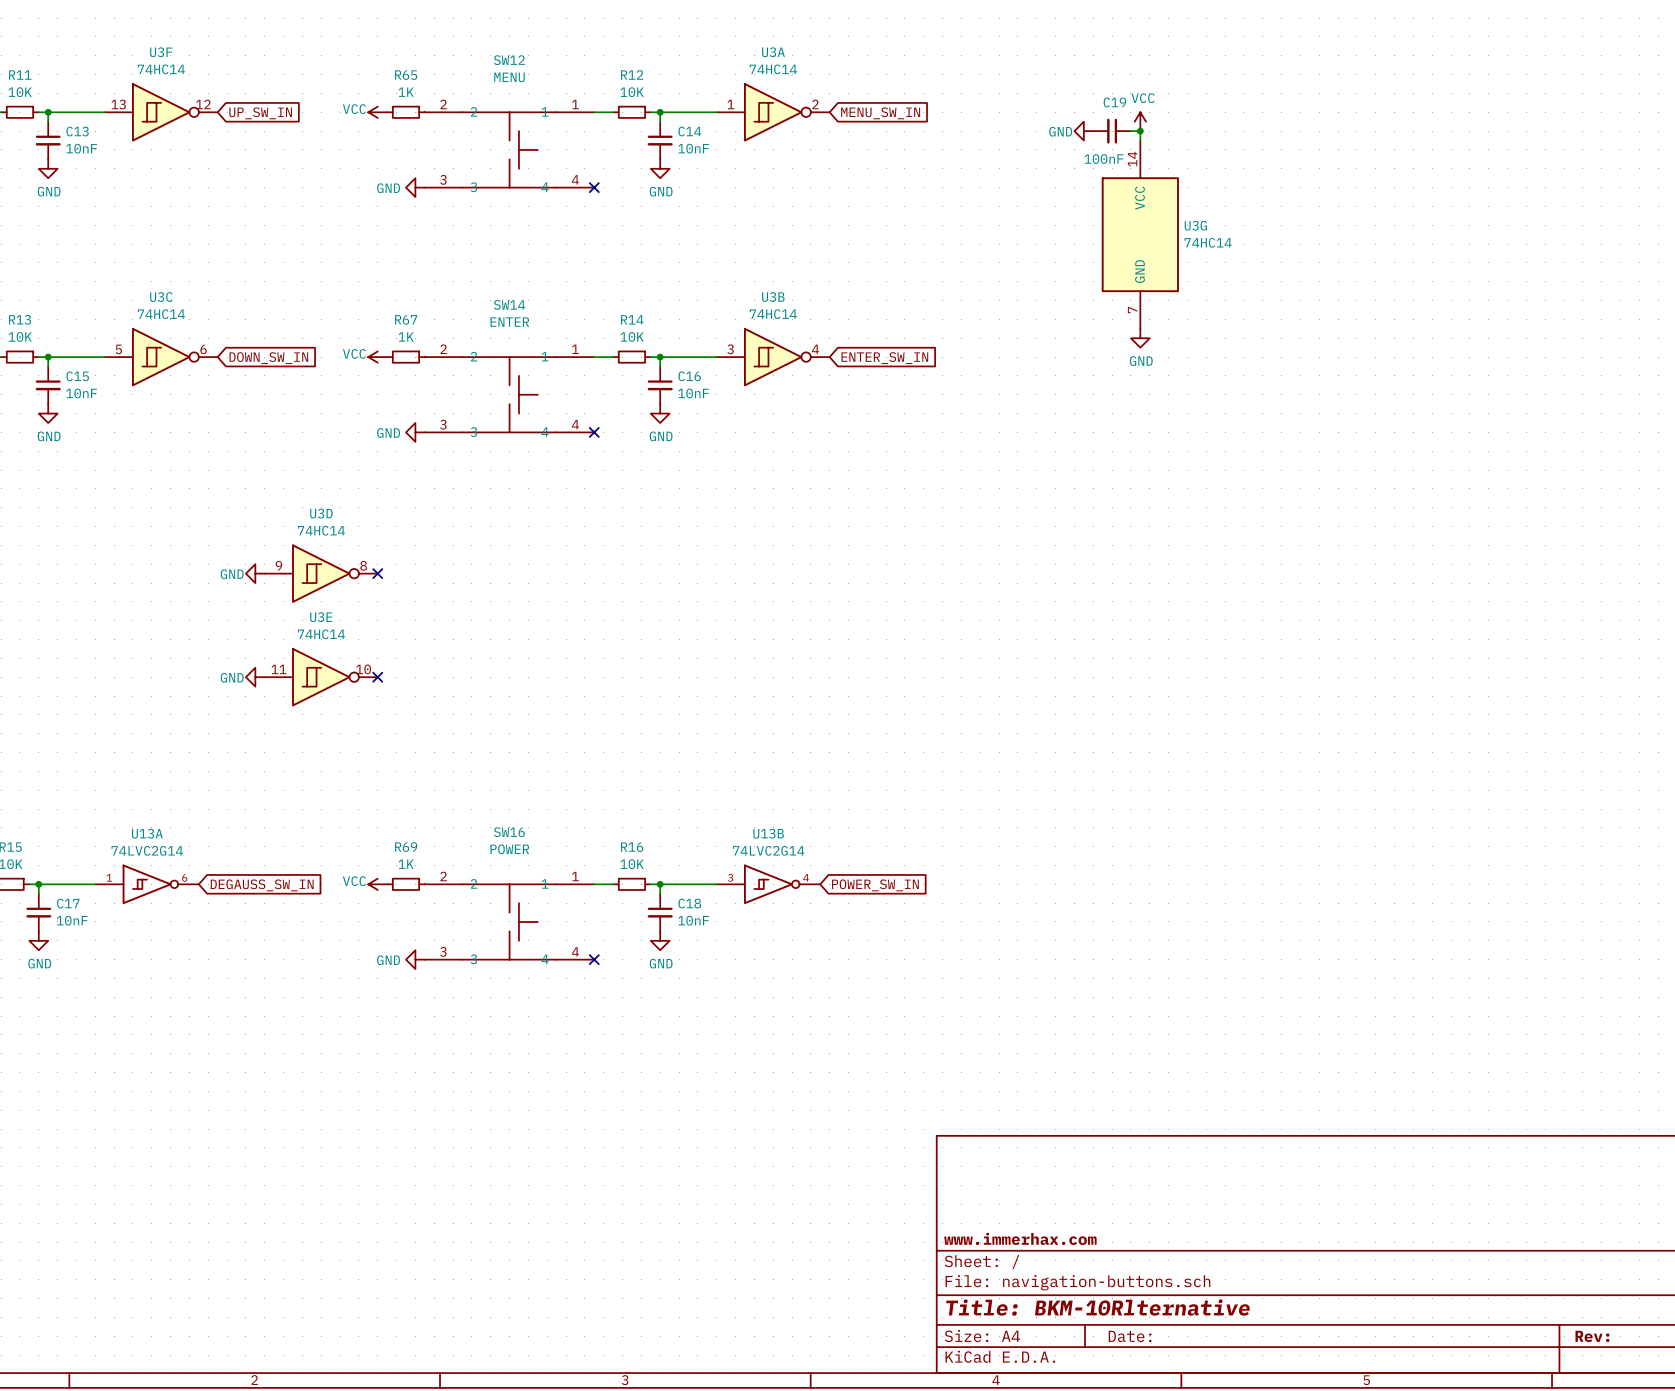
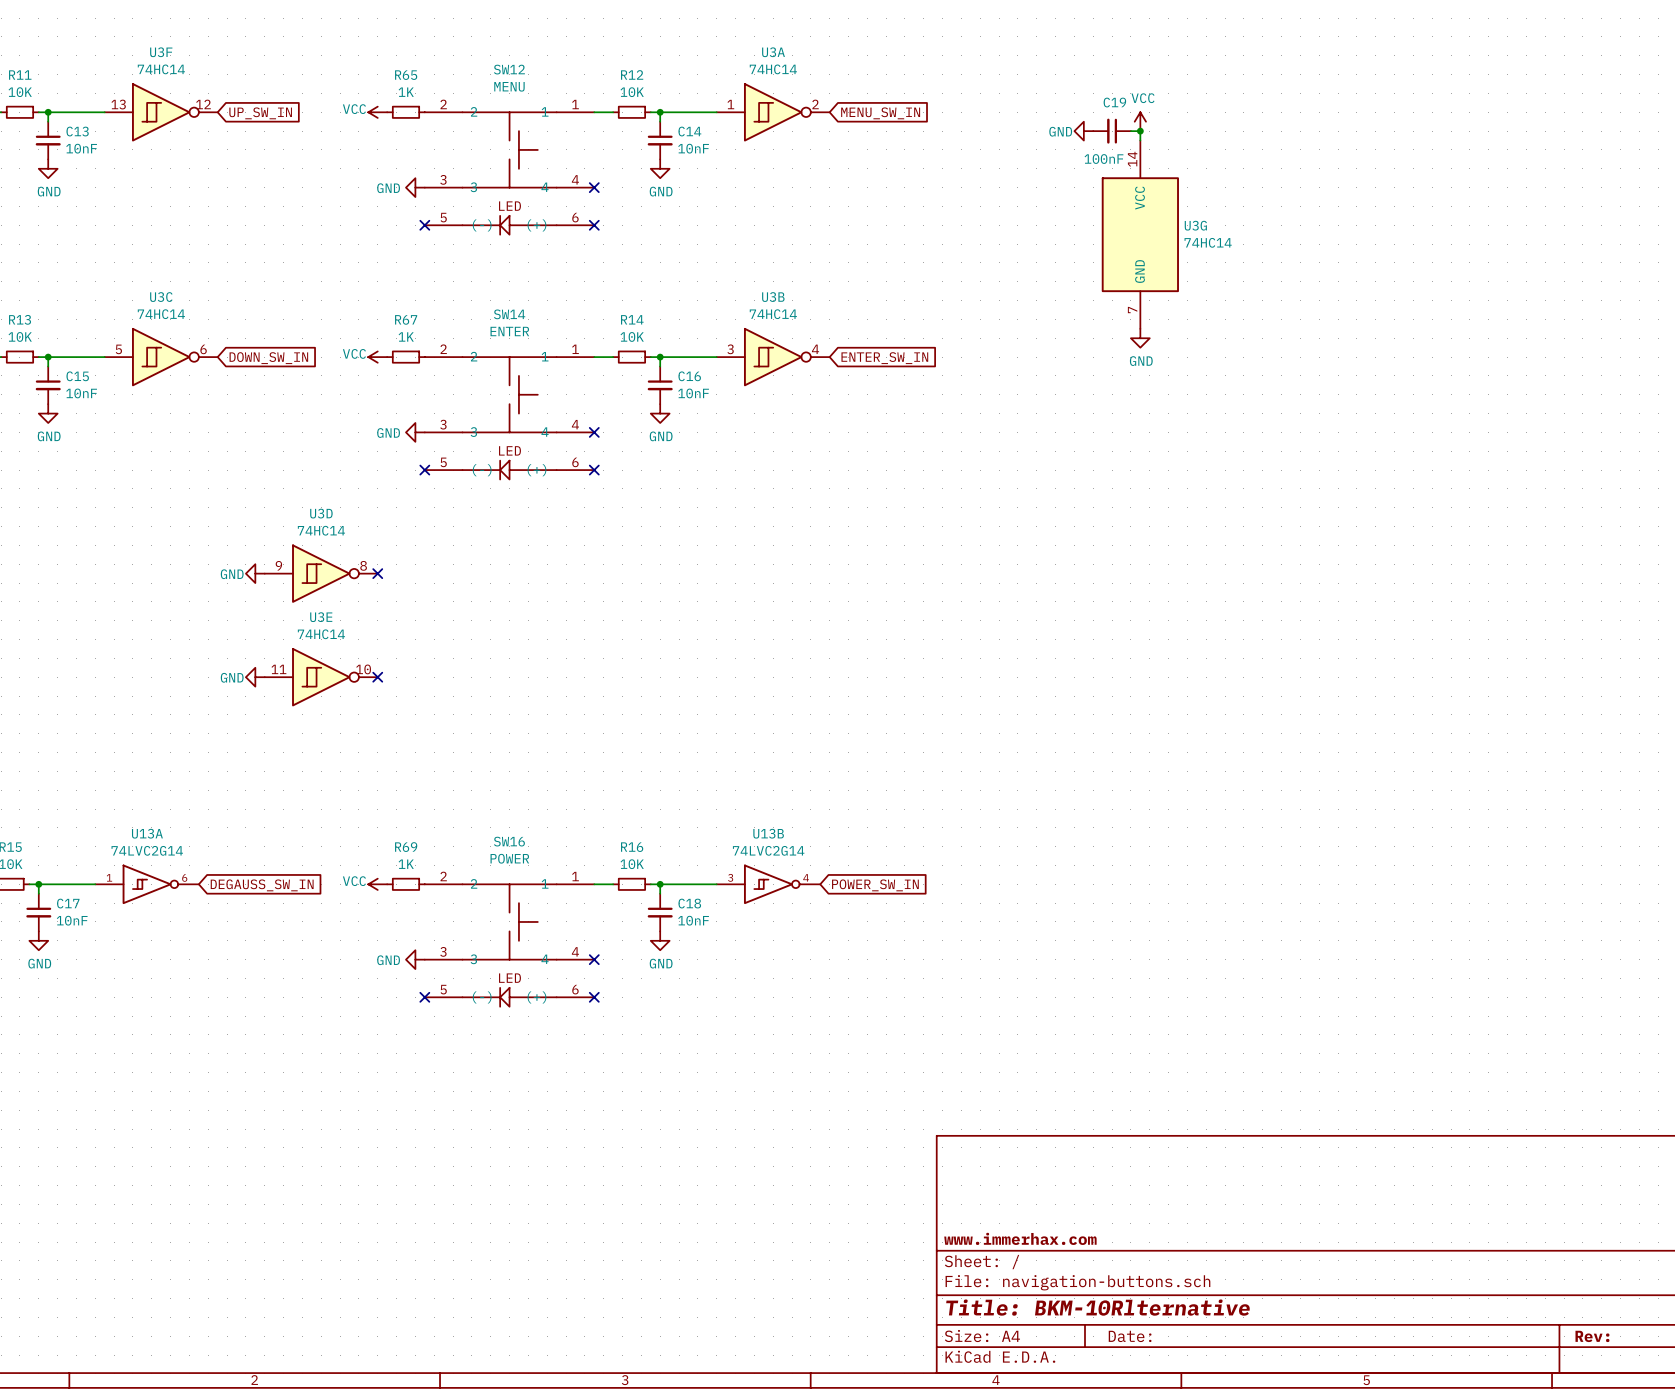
SW12 symbol: [424, 112, 595, 188] -> [424, 112, 595, 235]
no-connect mark: none -> (424, 225)
no-connect mark: none -> (594, 225)
SW14 symbol: [424, 357, 595, 433] -> [424, 357, 595, 480]
no-connect mark: none -> (424, 470)
no-connect mark: none -> (594, 470)
SW16 symbol: [424, 884, 595, 960] -> [424, 884, 595, 1007]
no-connect mark: none -> (424, 997)
no-connect mark: none -> (594, 997)

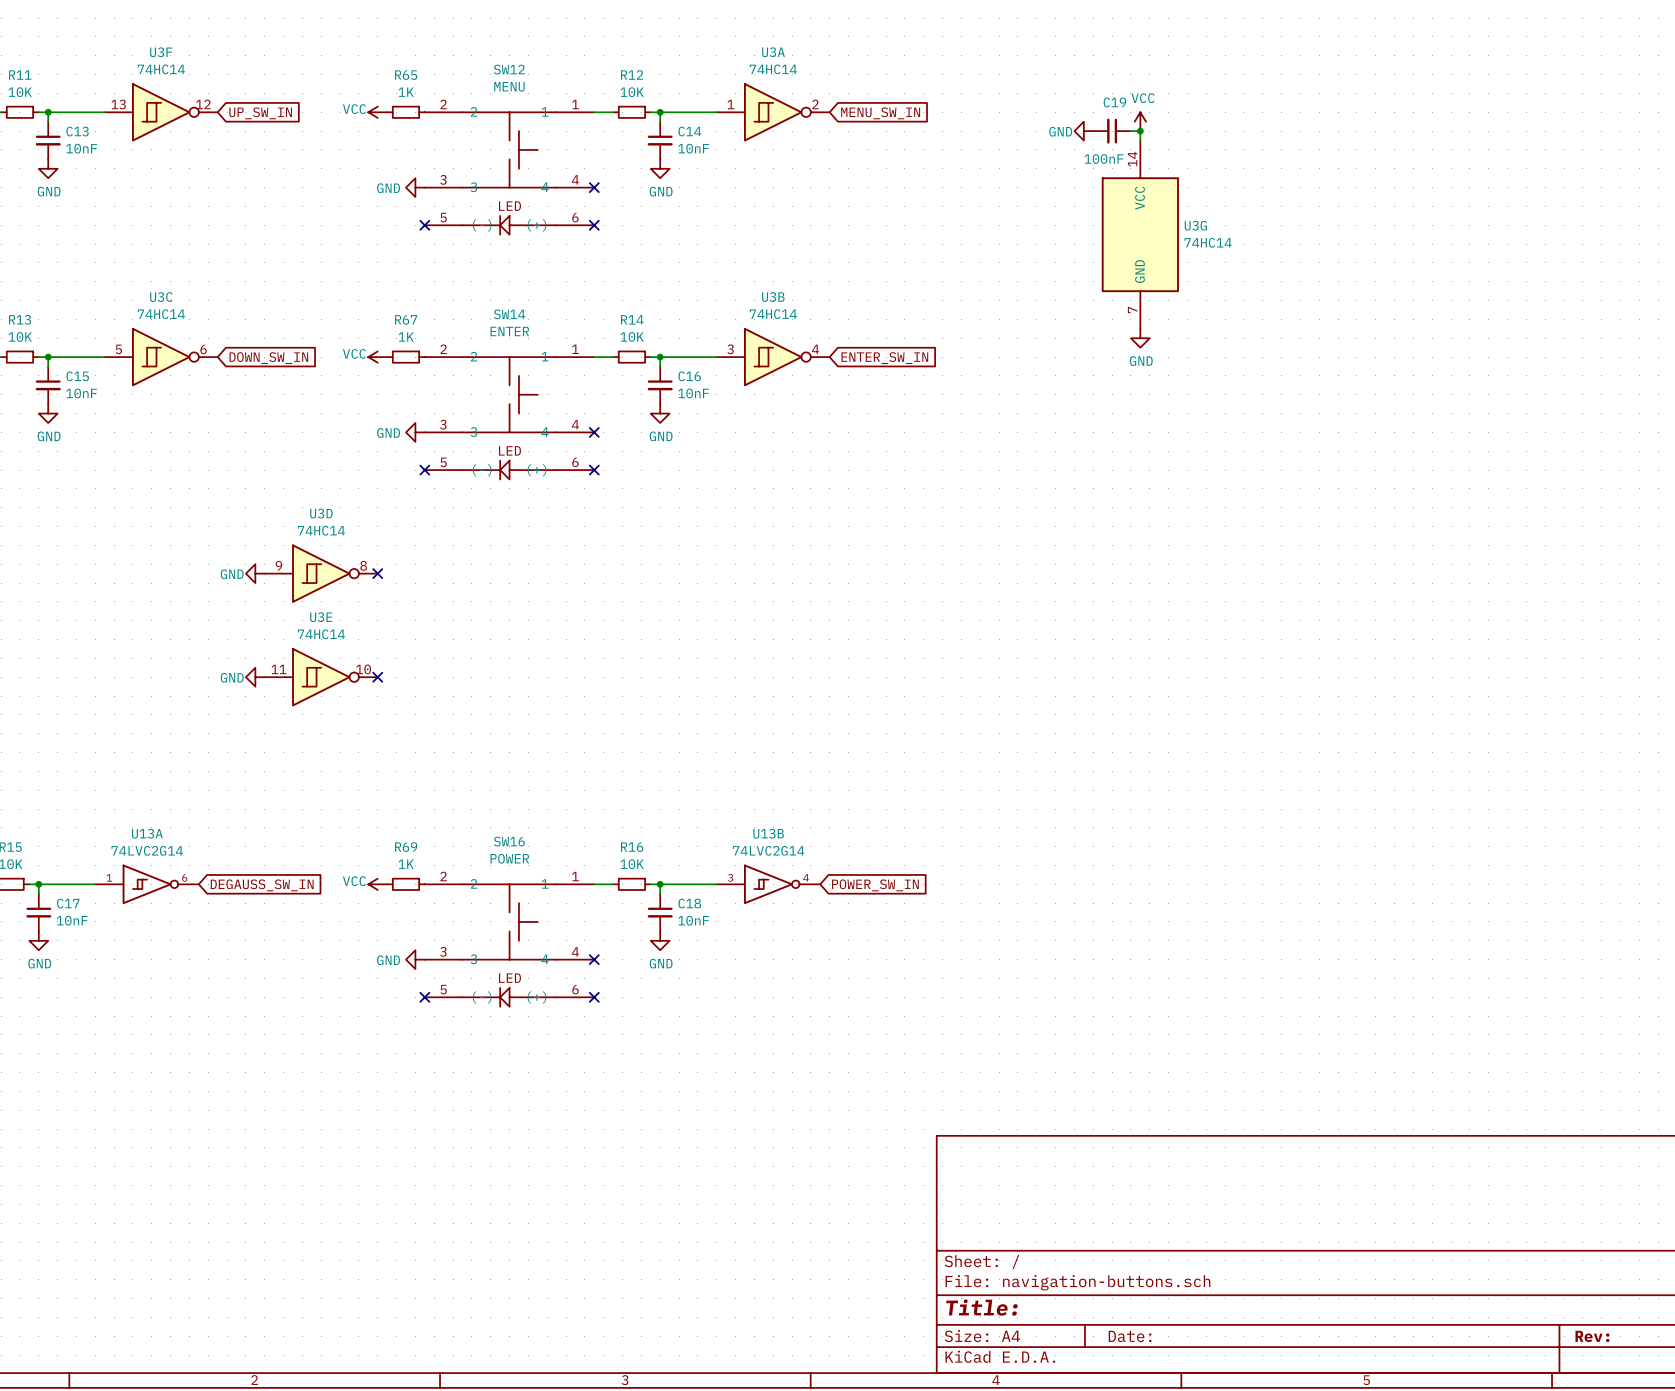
title block: www.immerhax.com (1020, 1238) -> none
title block: Title: BKM-10Rlternative (1098, 1307) -> Title: (981, 1307)

